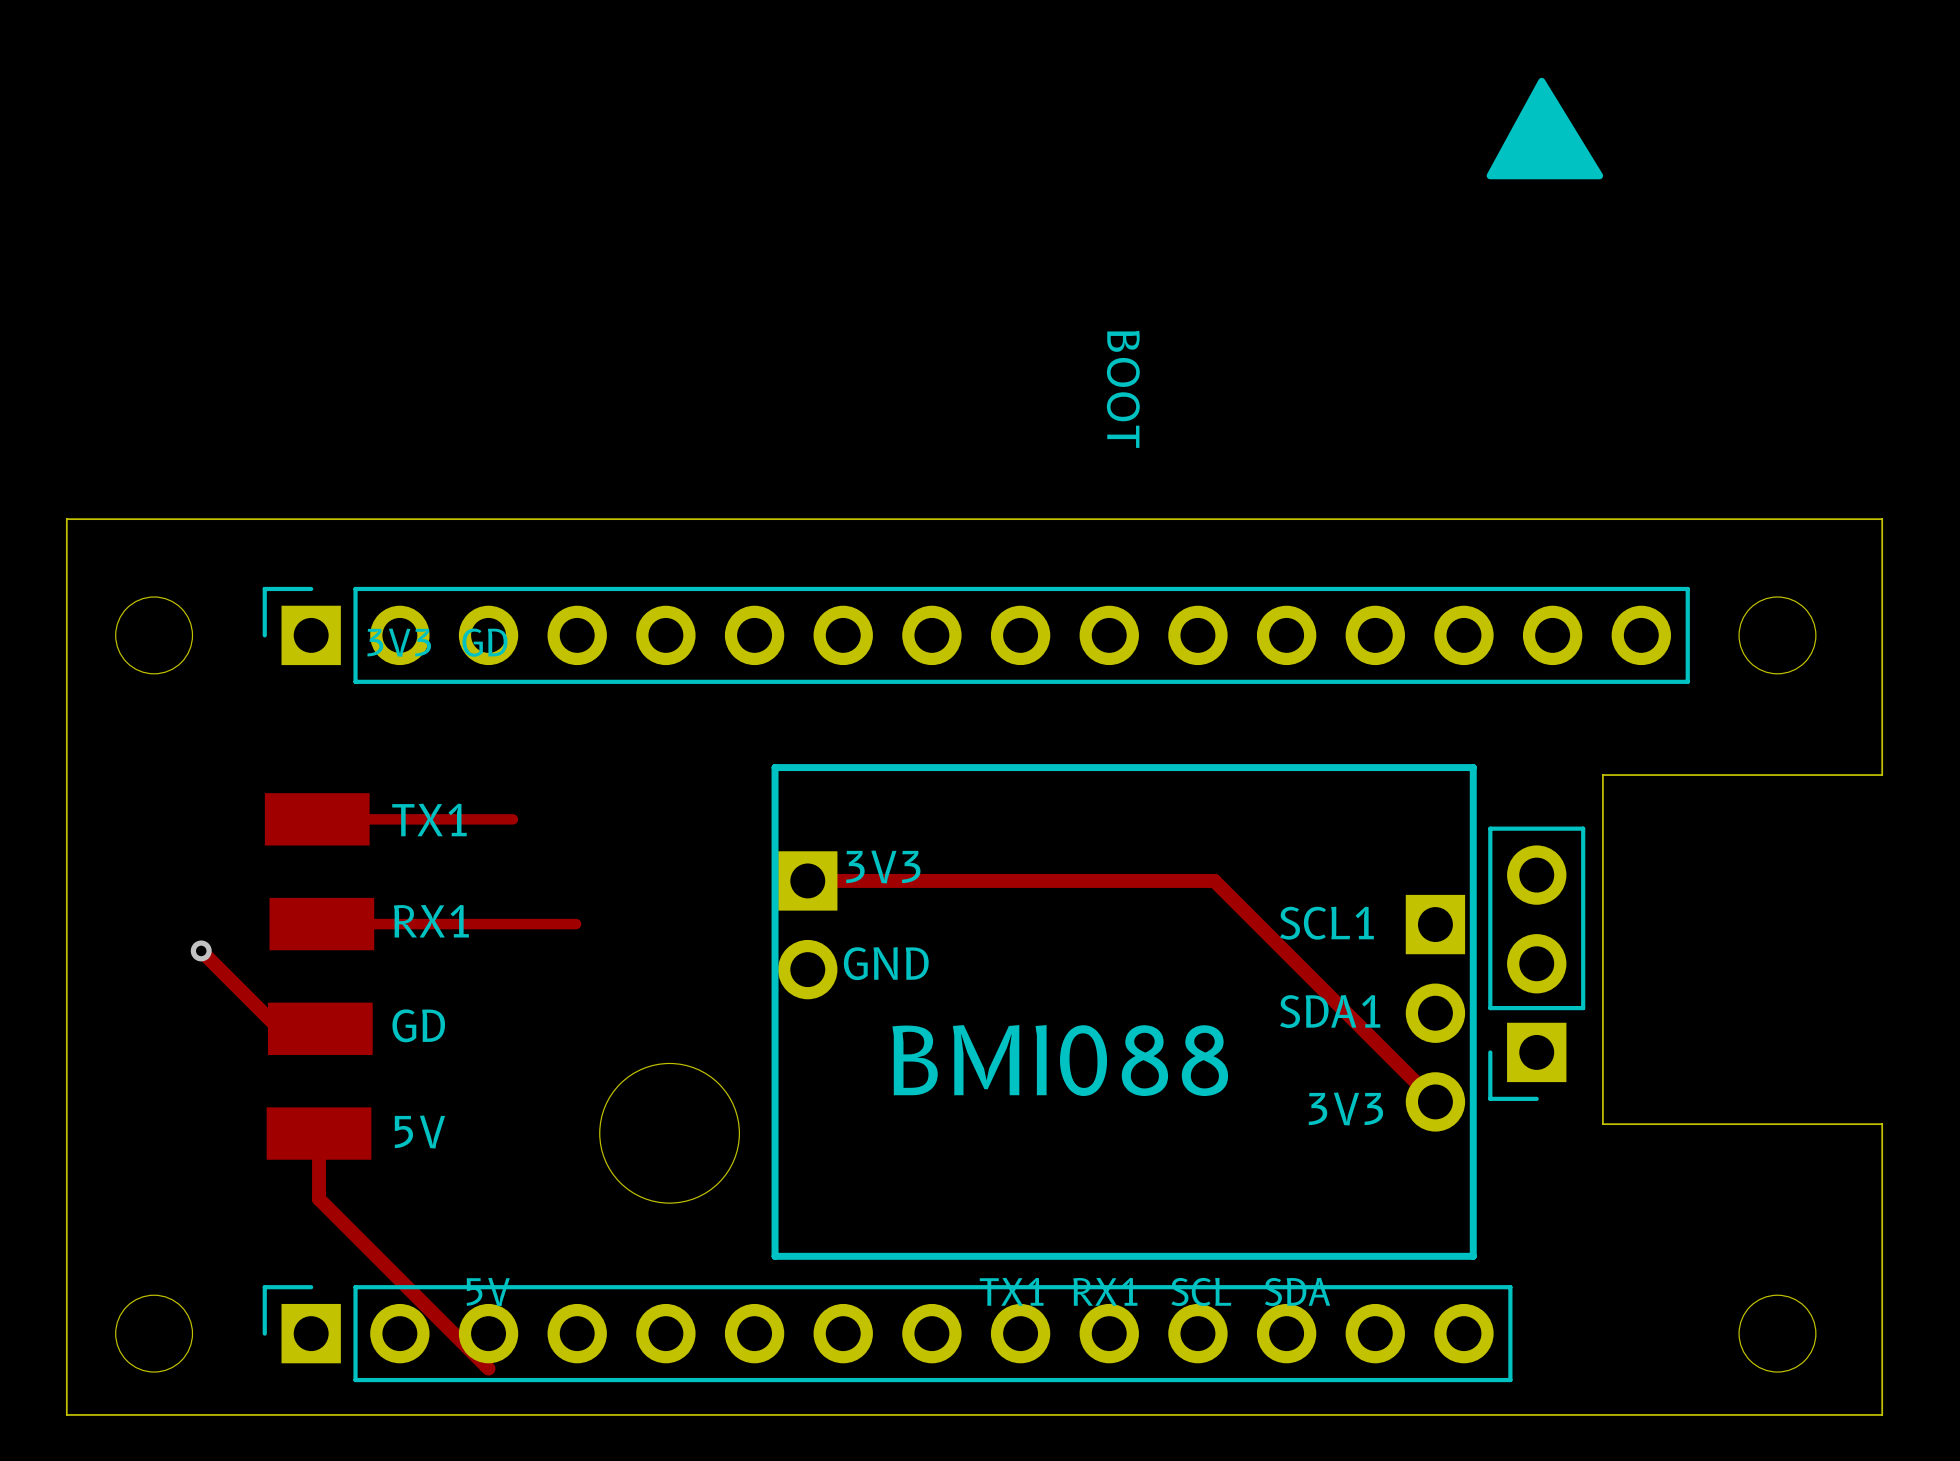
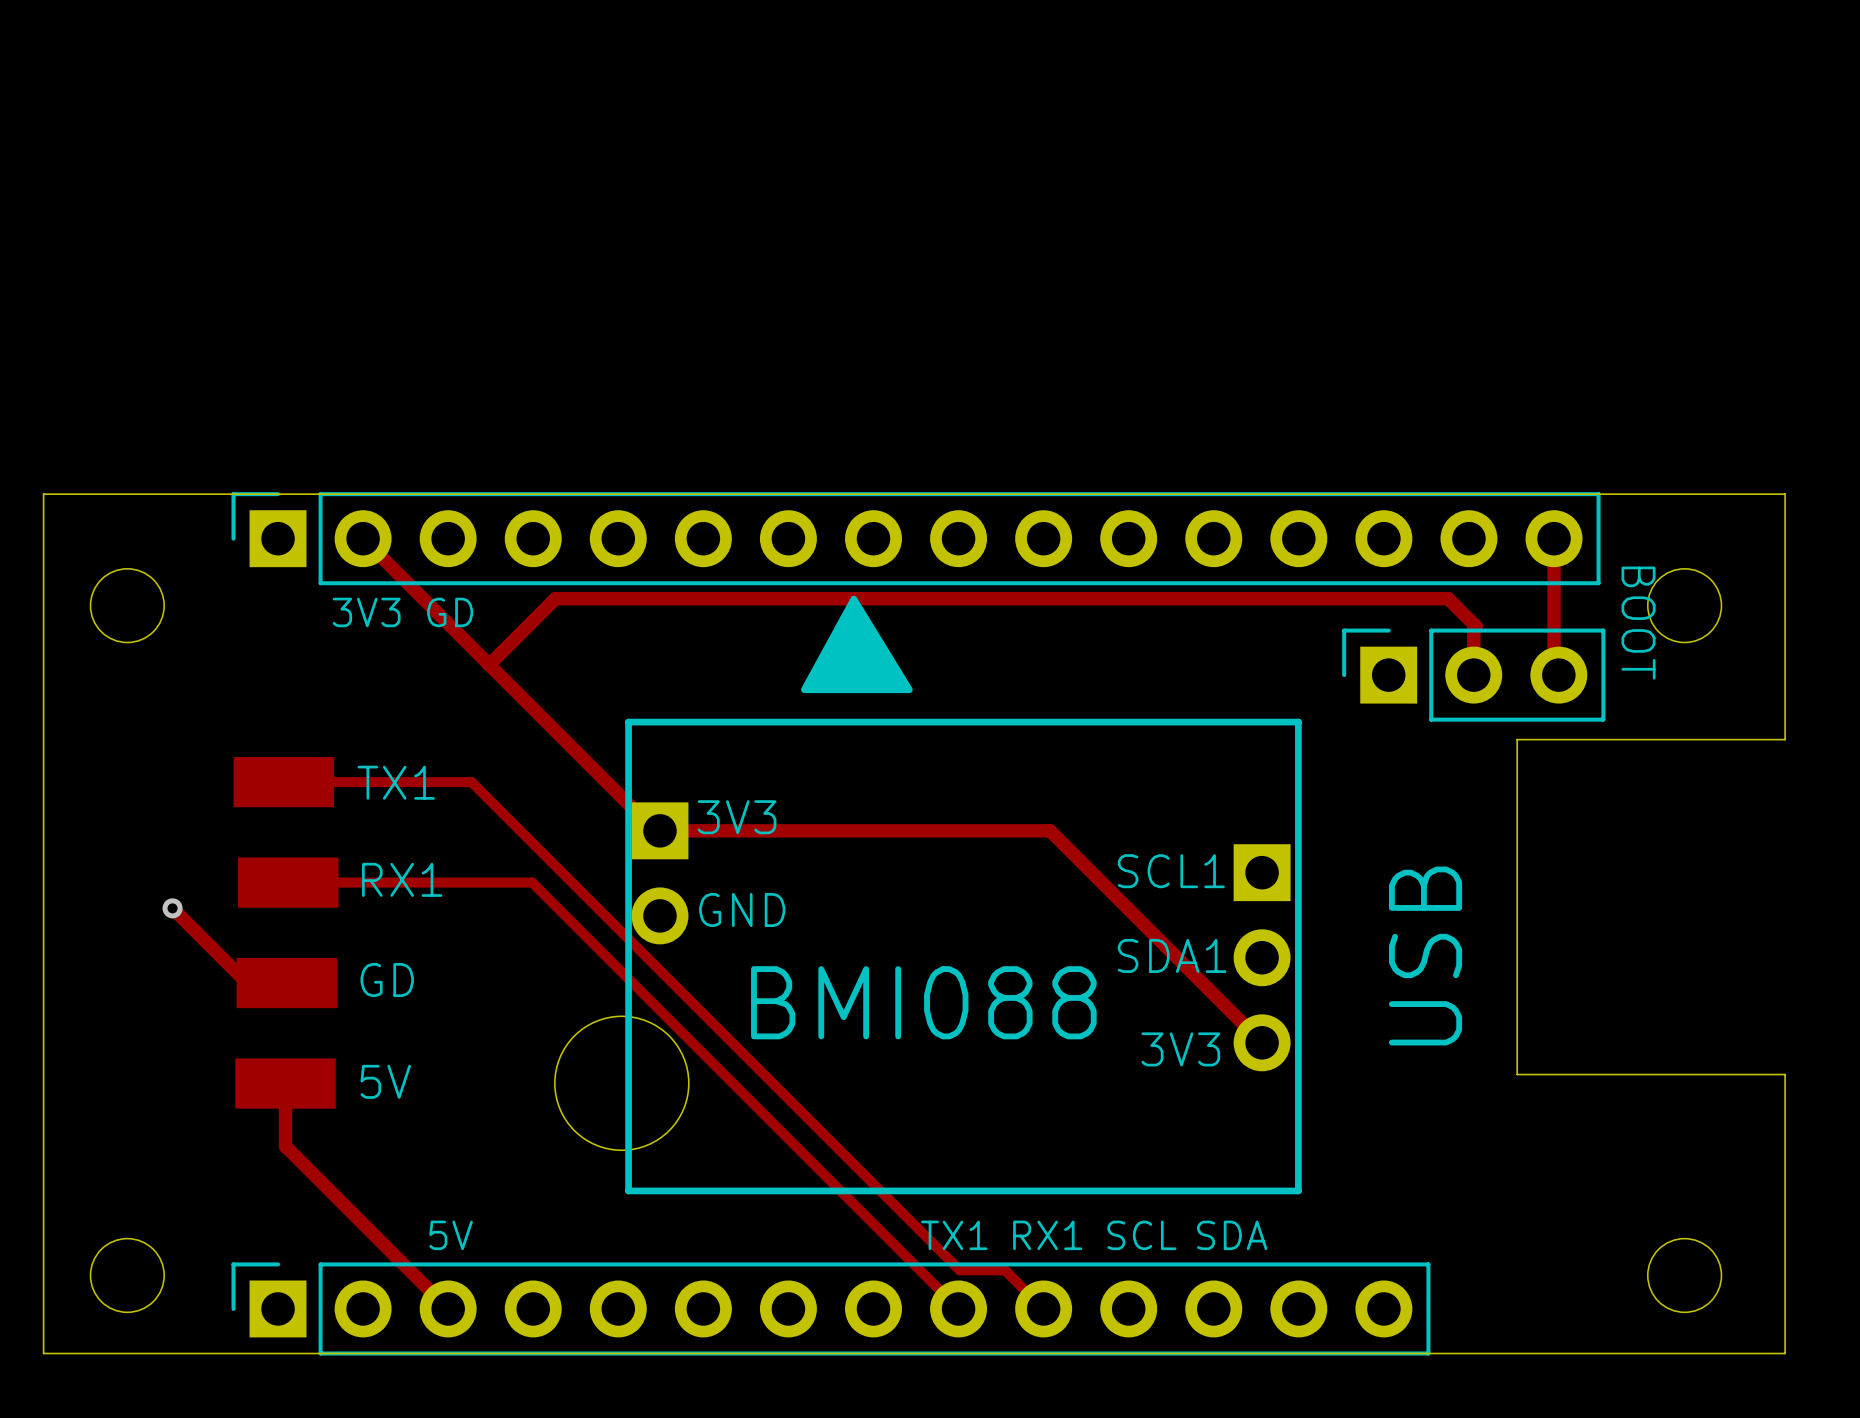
drawing position: (1544, 128) -> (856, 644)
text position: BOOT (1123, 389) -> BOOT (1638, 623)
track: none -> (363, 538) (655, 830) (1050, 830) (1262, 1042) (1258, 1046)
track: none -> (1554, 538) (1554, 670) (1558, 675)
part position: (976, 635) -> (916, 538)
track: none -> (489, 664) (555, 598) (1448, 598) (1476, 626) (1473, 628) (1473, 675)
line: (775, 767) (1473, 767) (1473, 1256) (775, 1256) (775, 767) -> (628, 722) (1298, 722) (1298, 1190) (628, 1190) (628, 722)
track: none -> (471, 782) (959, 1270) (1005, 1270) (1043, 1308)
text position: 3V3 (883, 866) -> 3V3 (737, 817)
track: (802, 880) (1214, 880) (1435, 1101) (1431, 1105) -> none
text position: SCL1 (1326, 923) -> SCL1 (1171, 871)
track: none -> (532, 882) (958, 1308)
part position: (807, 925) -> (659, 873)
text position: GND (886, 963) -> GND (742, 910)
part rotation: 0° (1536, 963) -> 90° clockwise (1473, 675)
part position: (1536, 963) -> (1473, 675)
text position: SDA1 (1330, 1011) -> SDA1 (1172, 955)
part position: (1435, 1013) -> (1262, 957)
text: none -> USB (1425, 956)
text position: BMI088 (1060, 1060) -> BMI088 (923, 1002)
text position: 3V3 (1345, 1109) -> 3V3 (1180, 1049)
part position: (887, 1333) -> (830, 1308)

